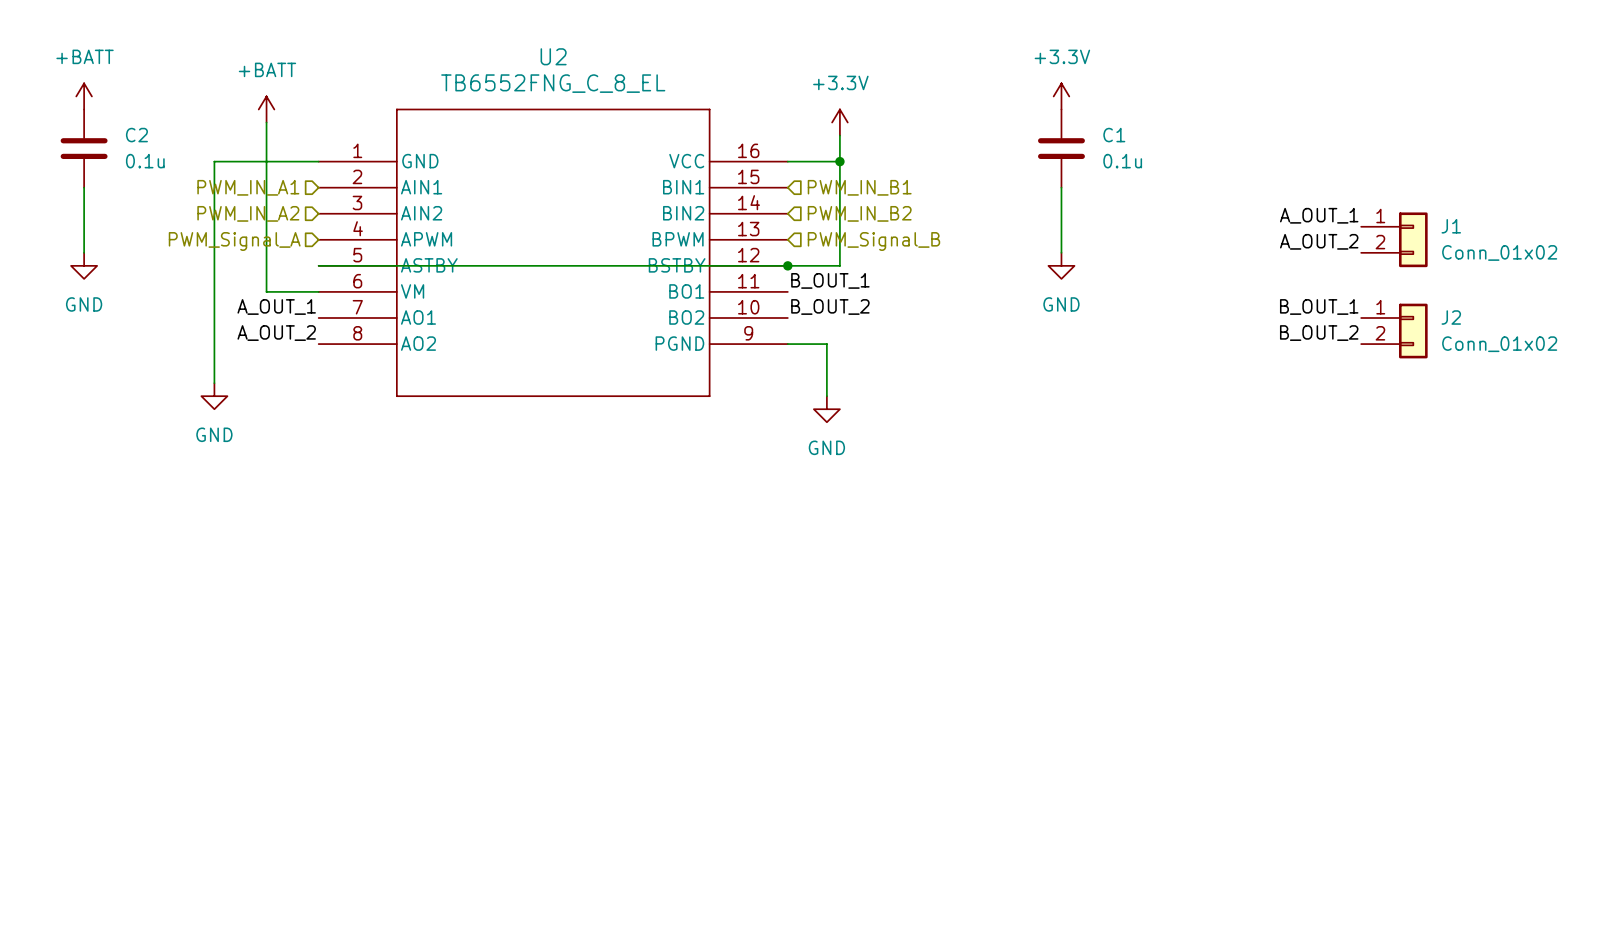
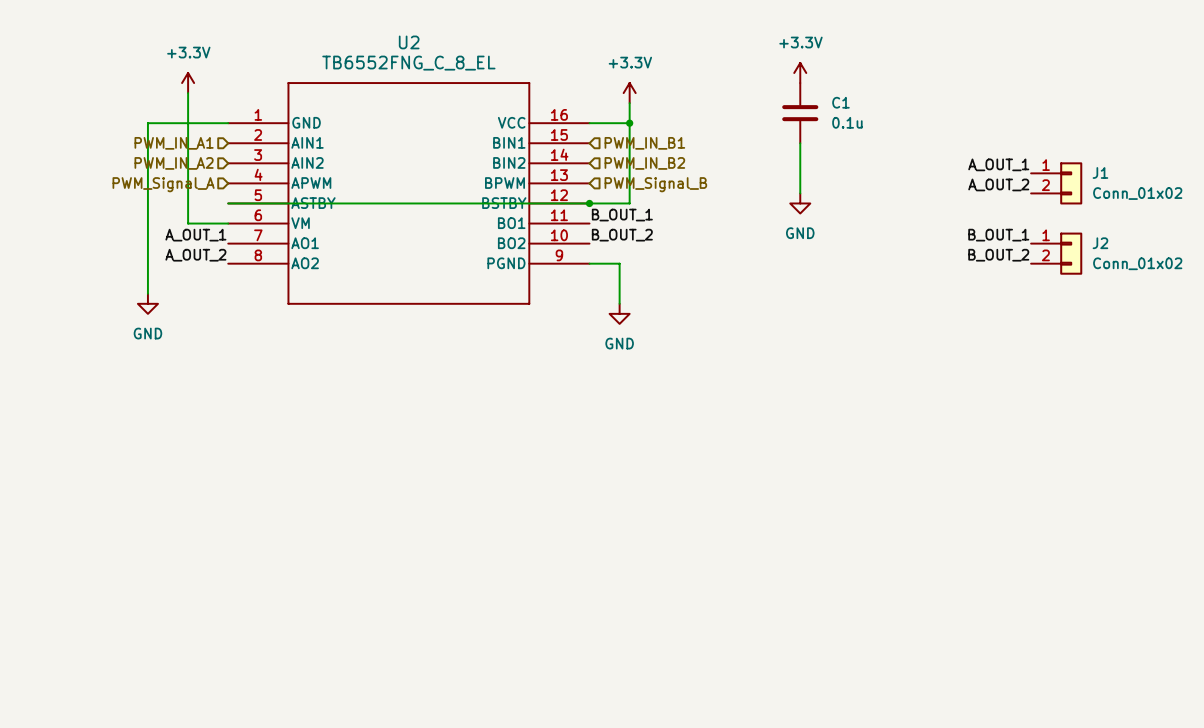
power symbol: +BATT (84, 96) -> none
power symbol: +BATT (266, 109) -> +3.3V (188, 83)
C2: 0.1u (84, 148) -> none
wire: (84, 187) (84, 252) -> none
power symbol: GND (84, 265) -> none

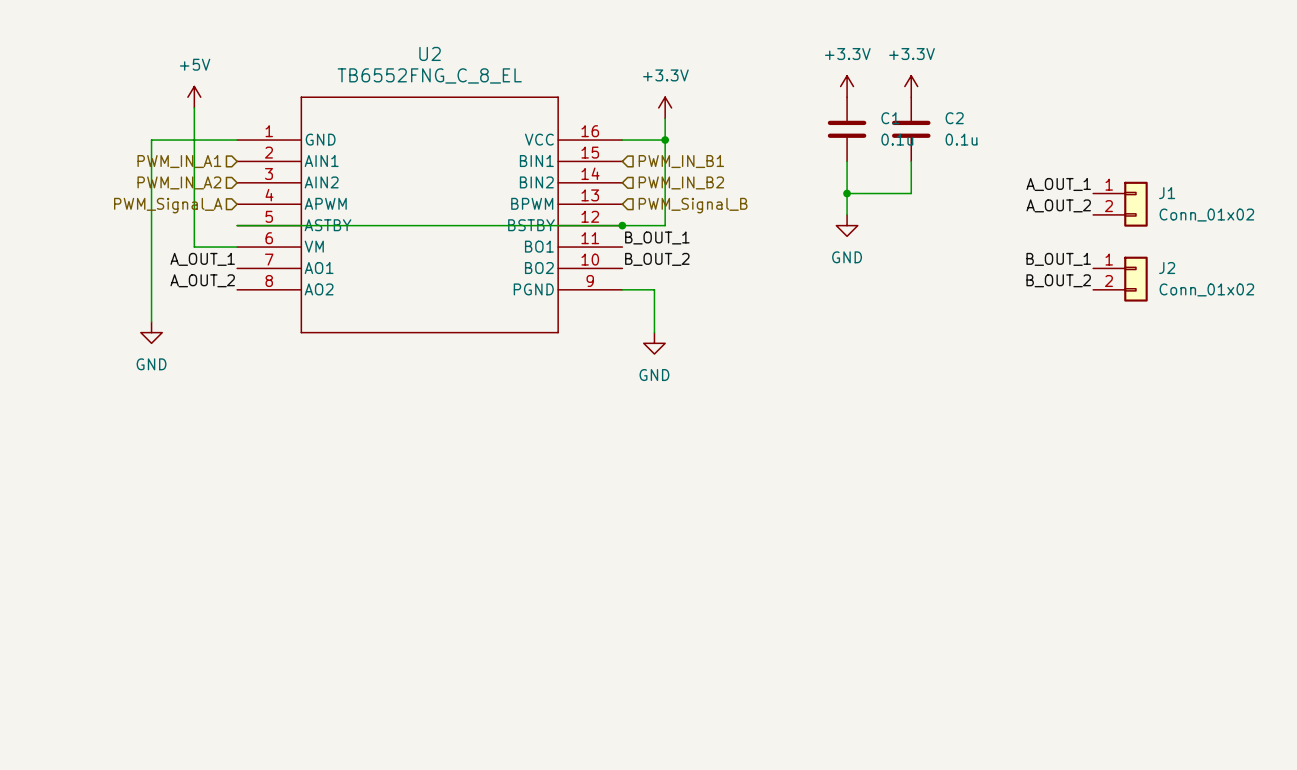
power symbol: none -> +3.3V (911, 86)
power symbol: +3.3V (188, 83) -> +5V (194, 97)
C2: none -> 0.1u (911, 129)
wire: none -> (911, 161) (911, 193) (847, 193)
junction: none -> (847, 193)

